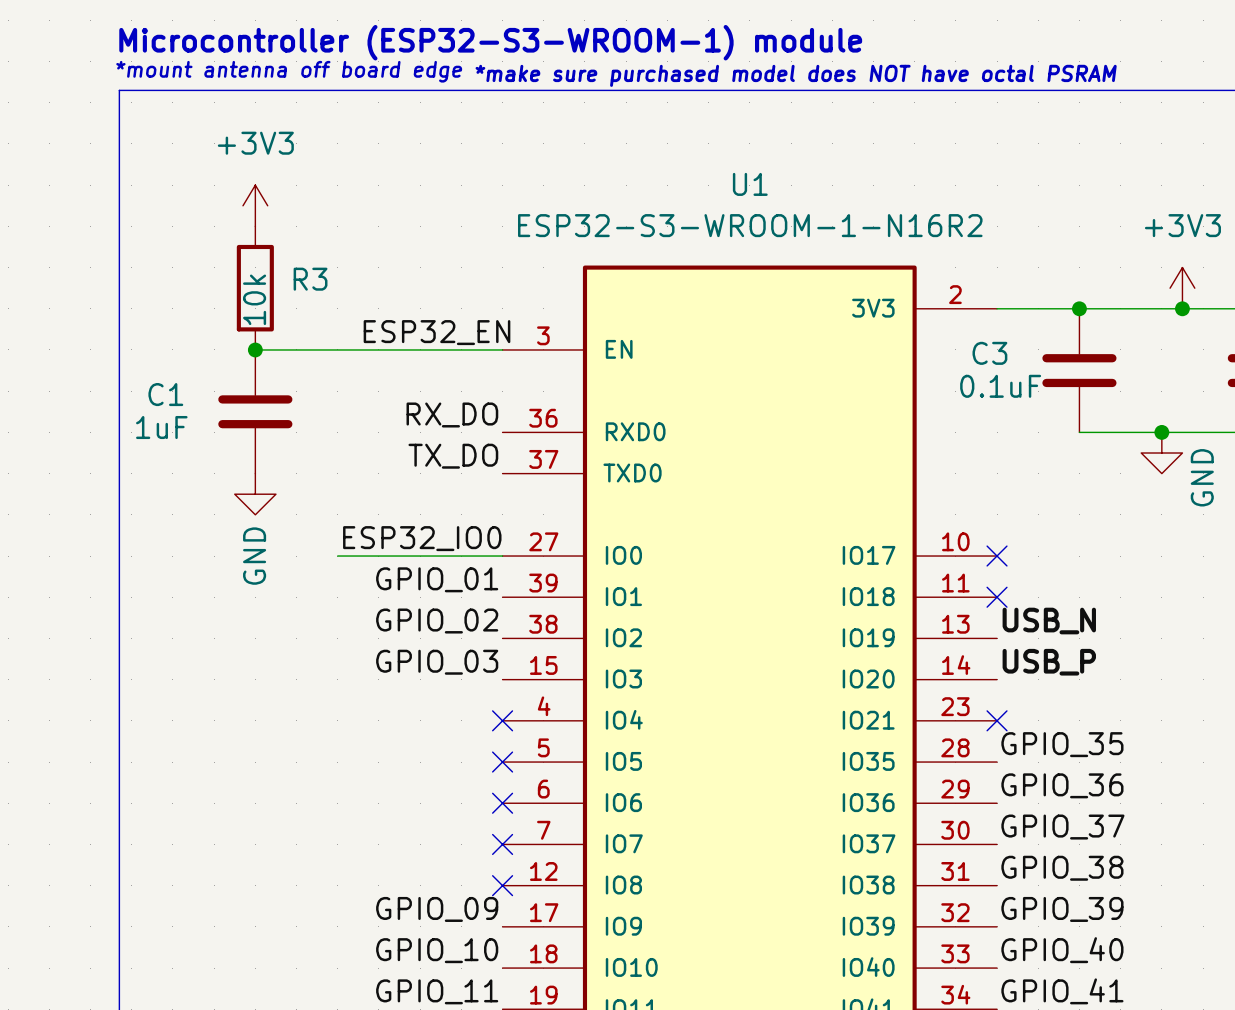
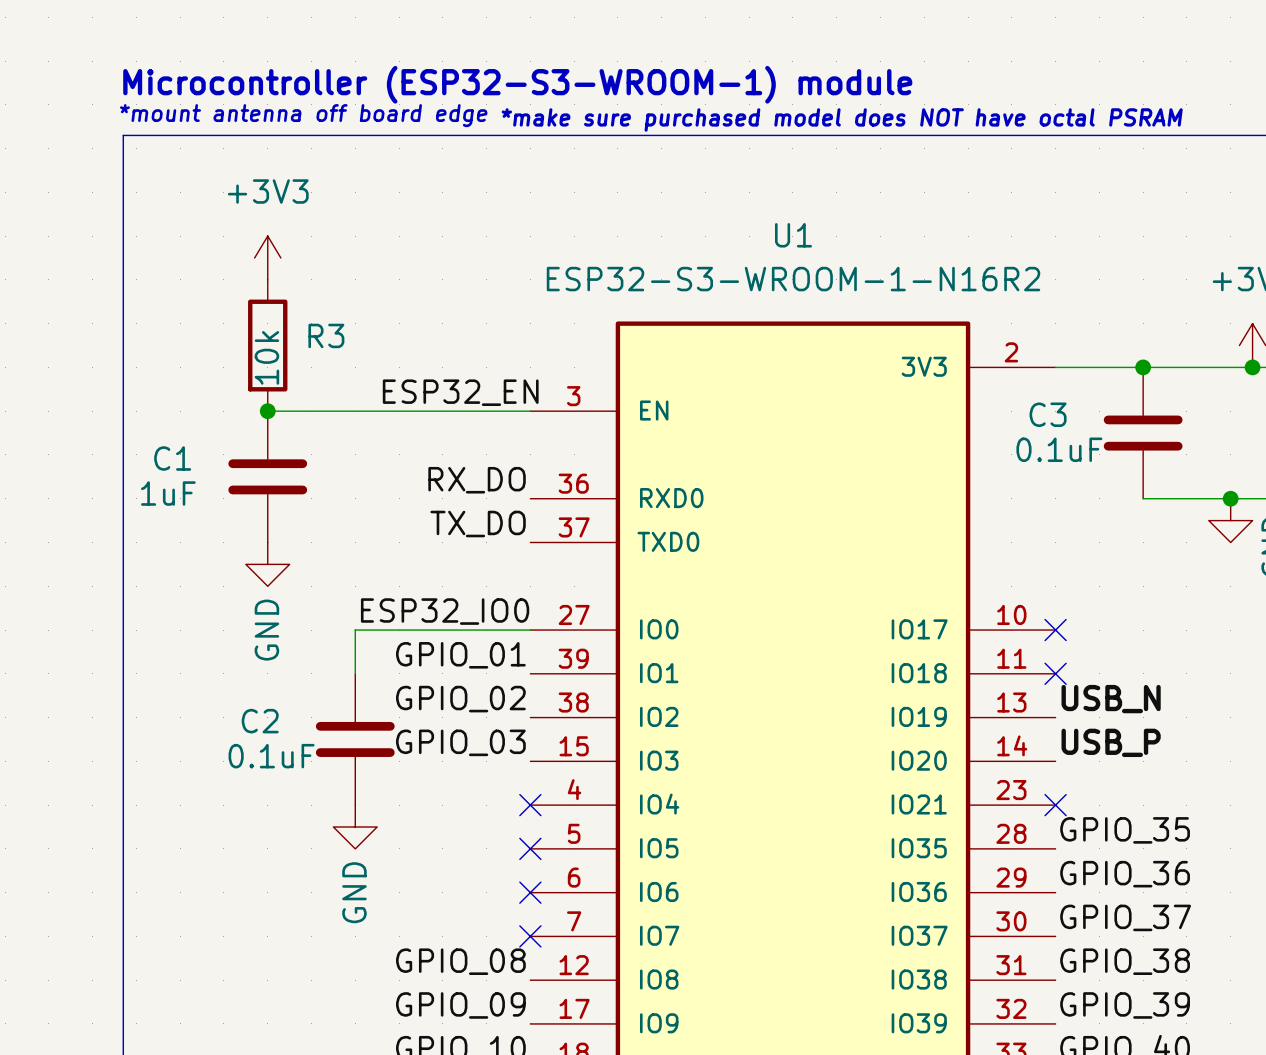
wire: none -> (355, 630) (355, 673)
C2: none -> 0.1uF (355, 739)
power symbol: none -> GND (355, 826)
label: none -> GPIO_08 (460, 961)
no-connect mark: (502, 885) -> none

